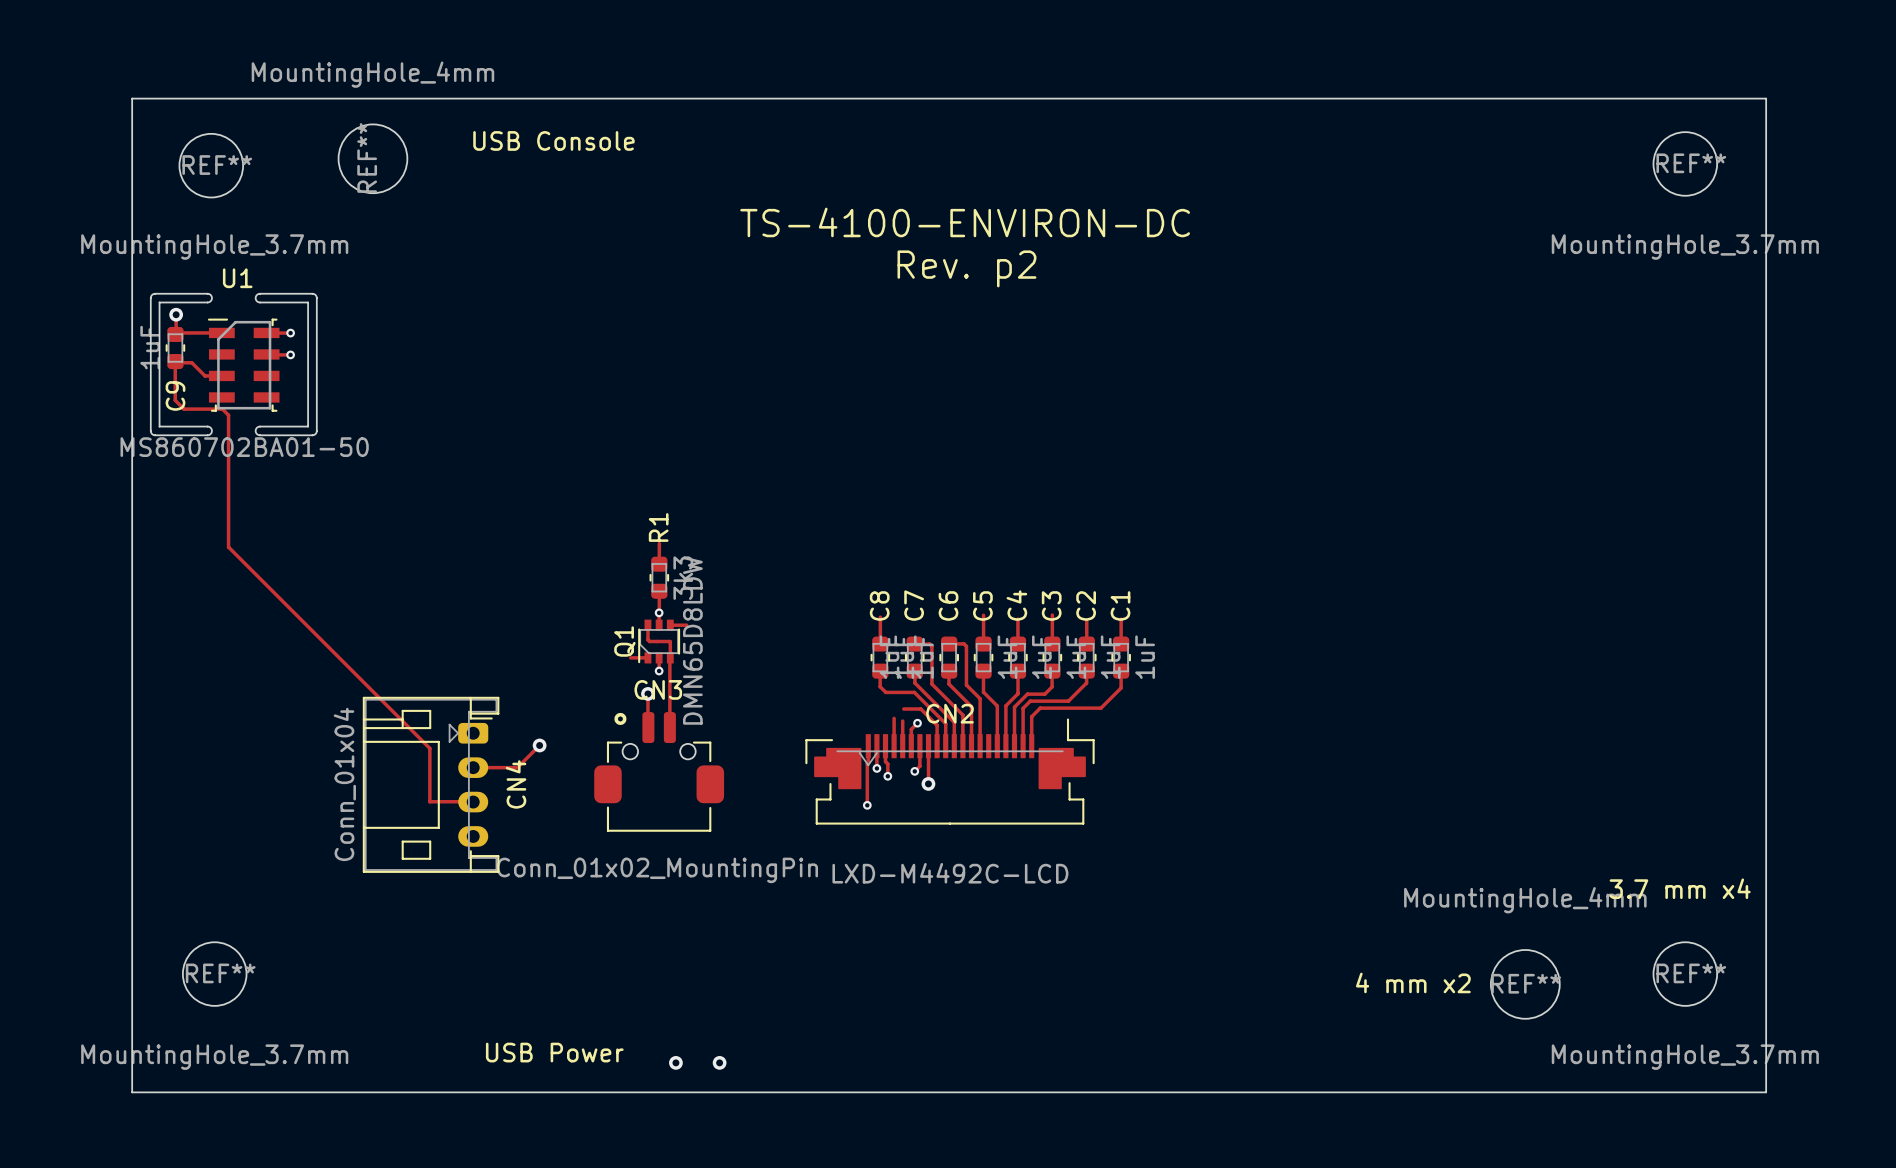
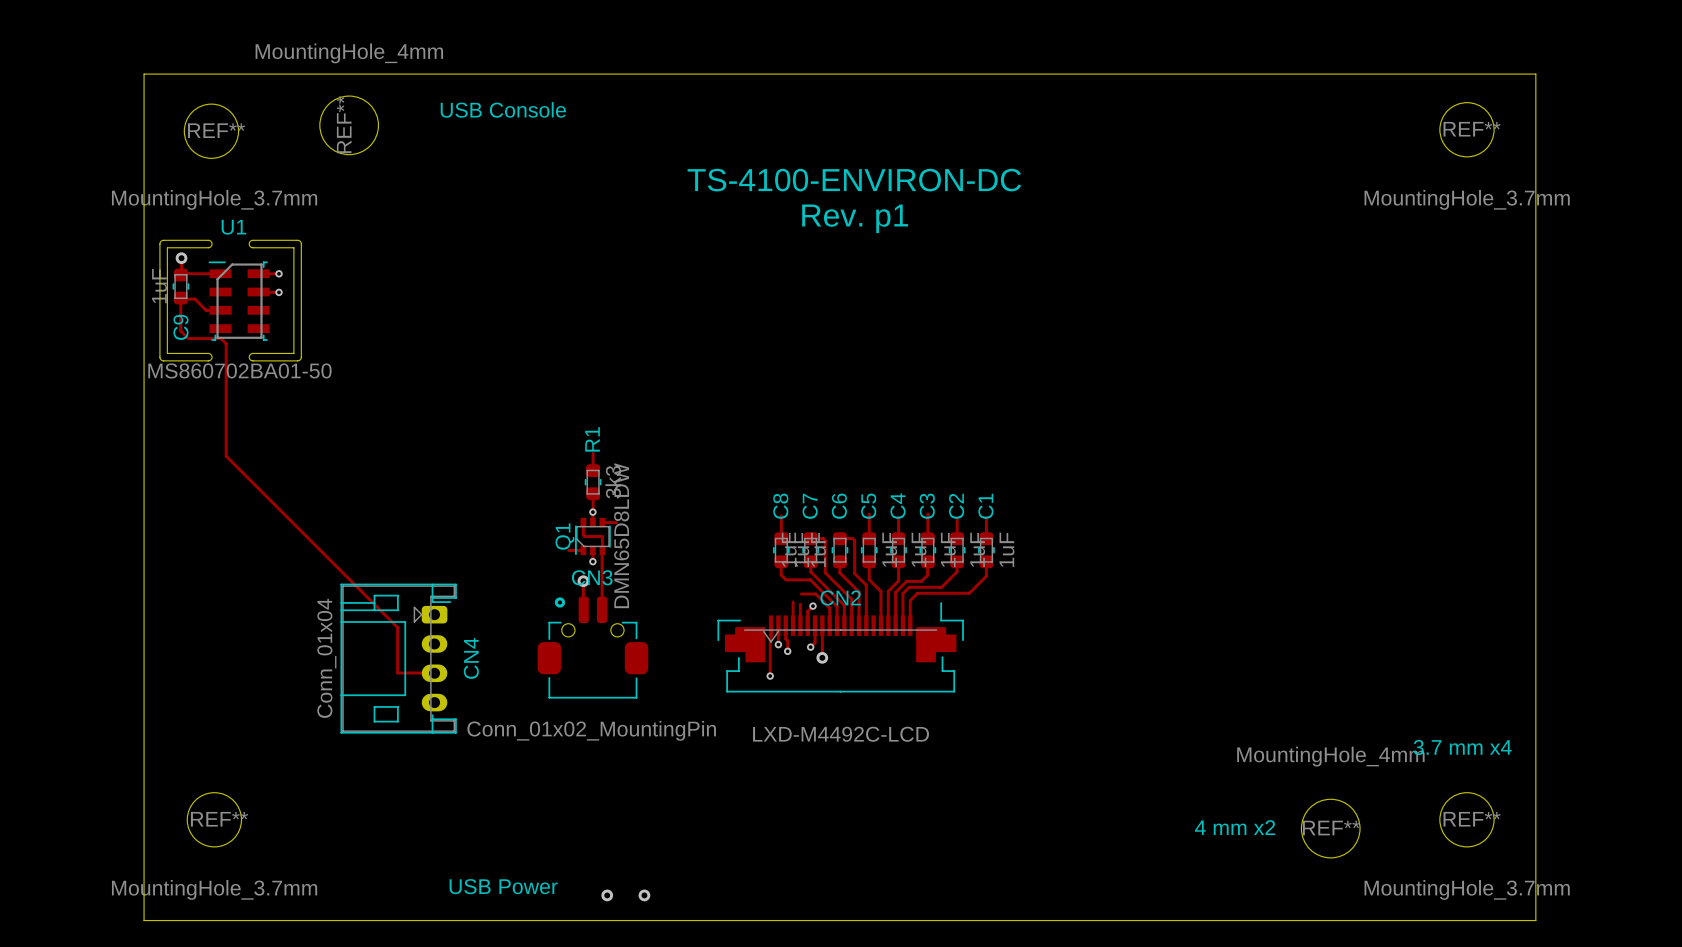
text: Rev. p2 (966, 268) -> Rev. p1 (855, 218)
track: (539, 745) (517, 767) (473, 767) -> none
via: (539, 745) -> none

